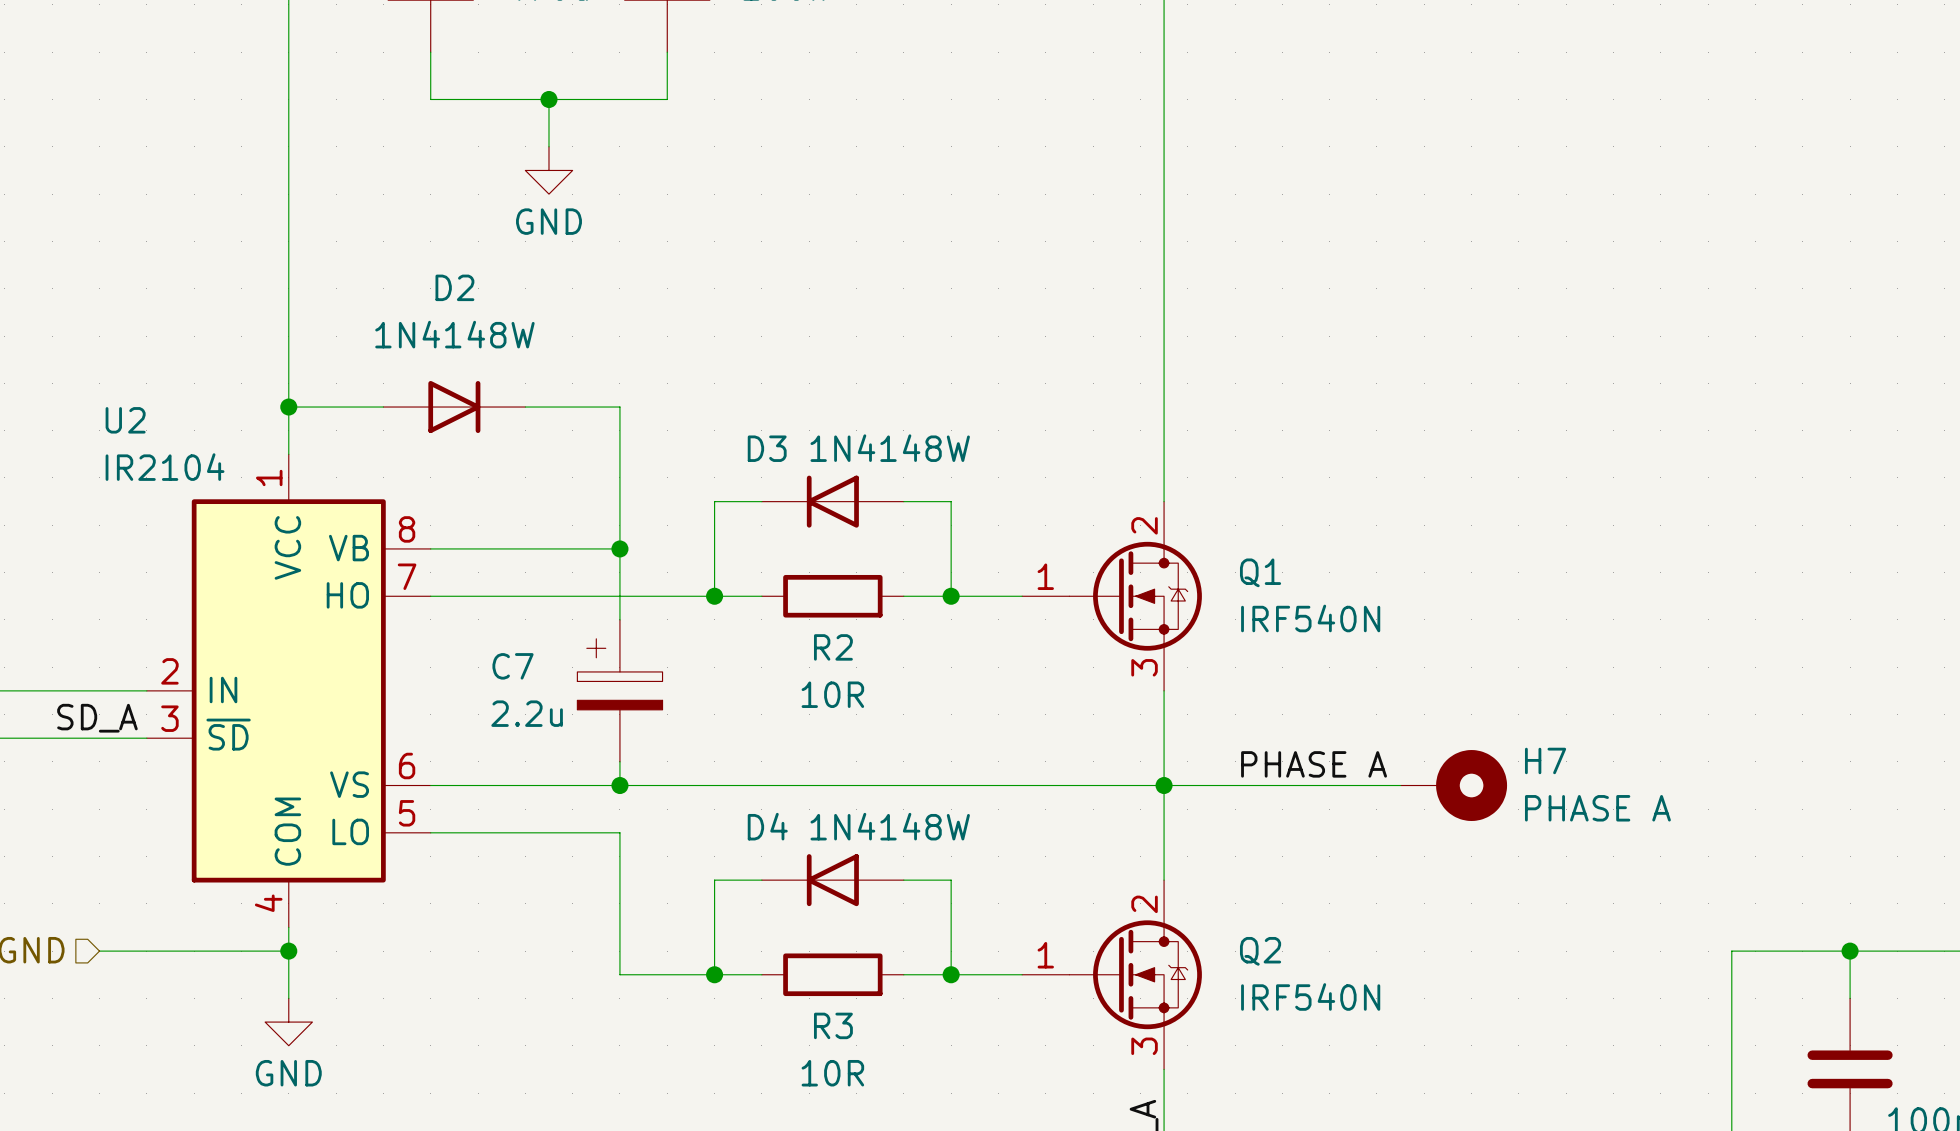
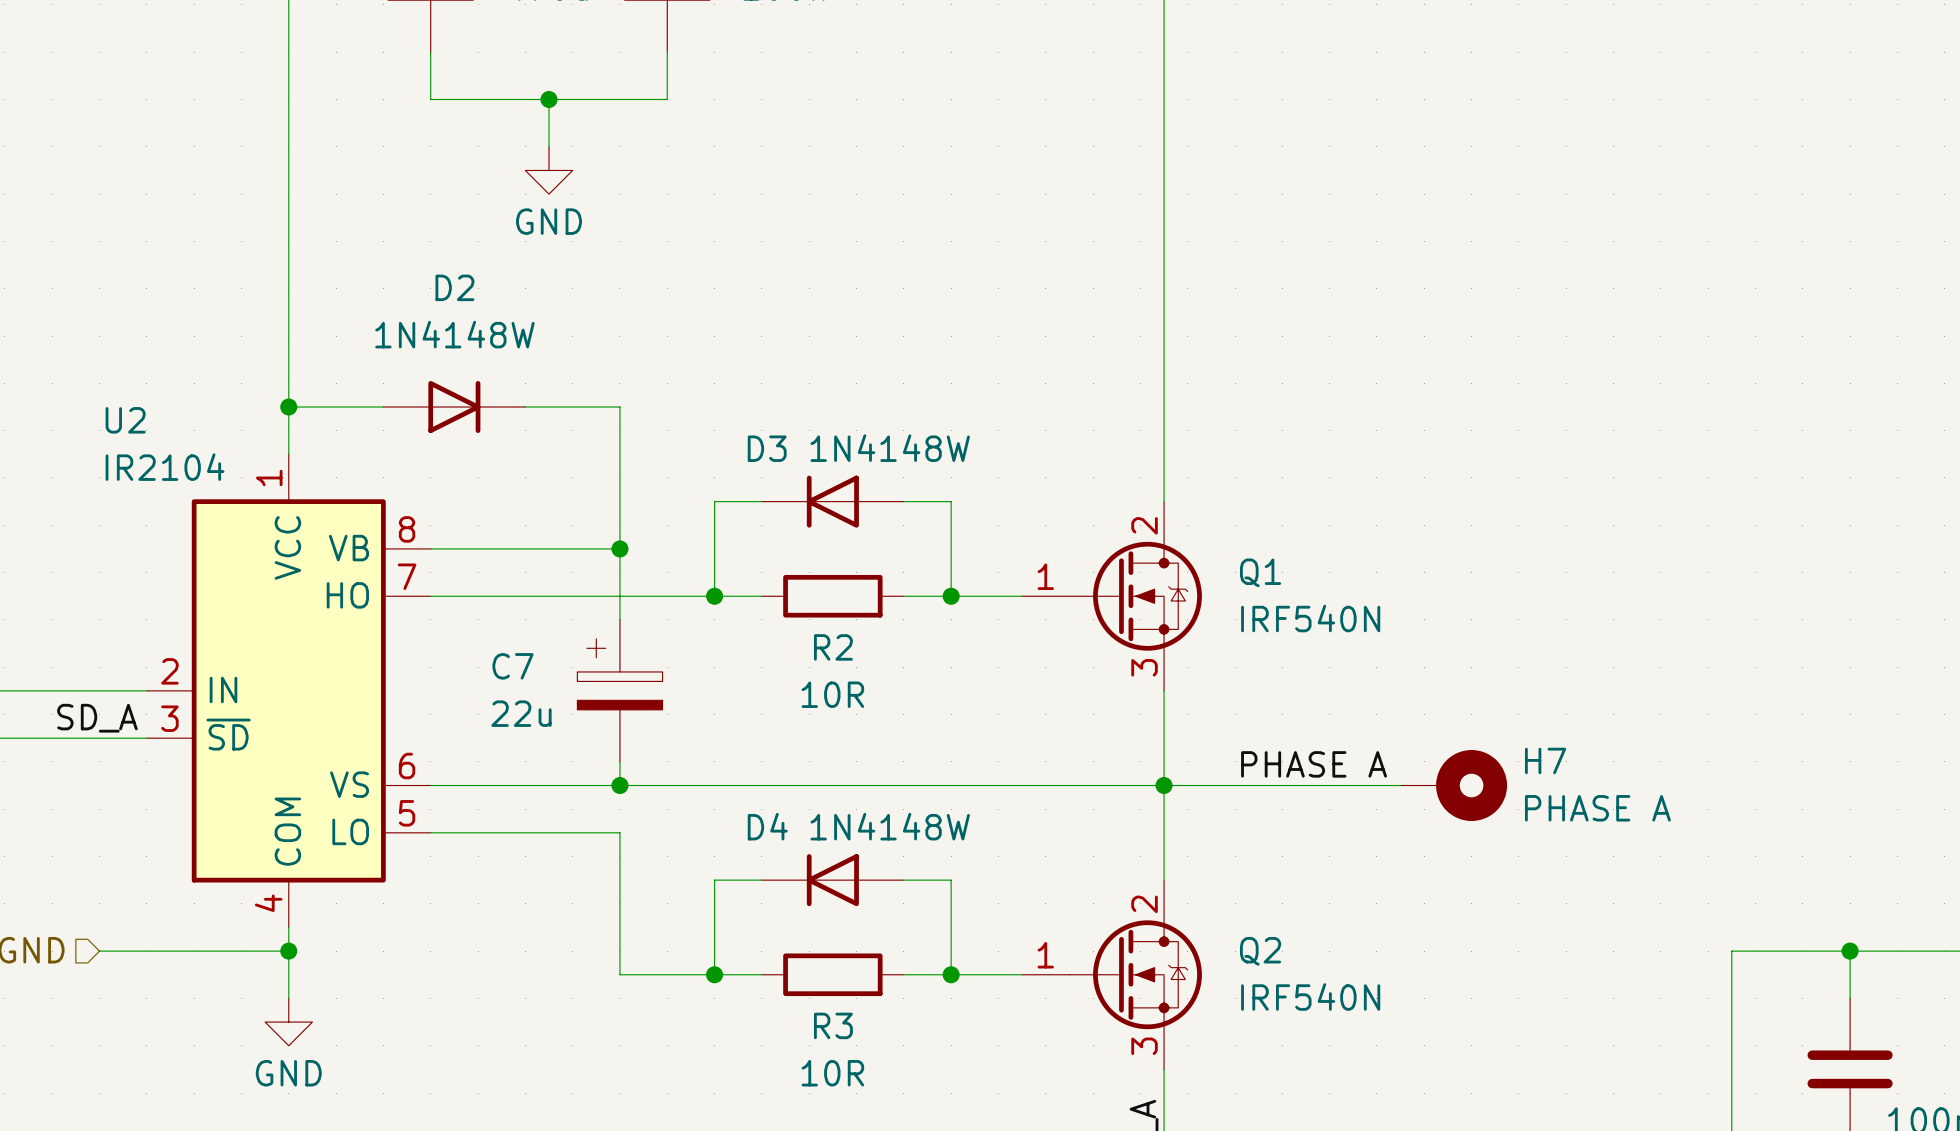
C7 value: 2.2u (527, 713) -> 22u (521, 713)

